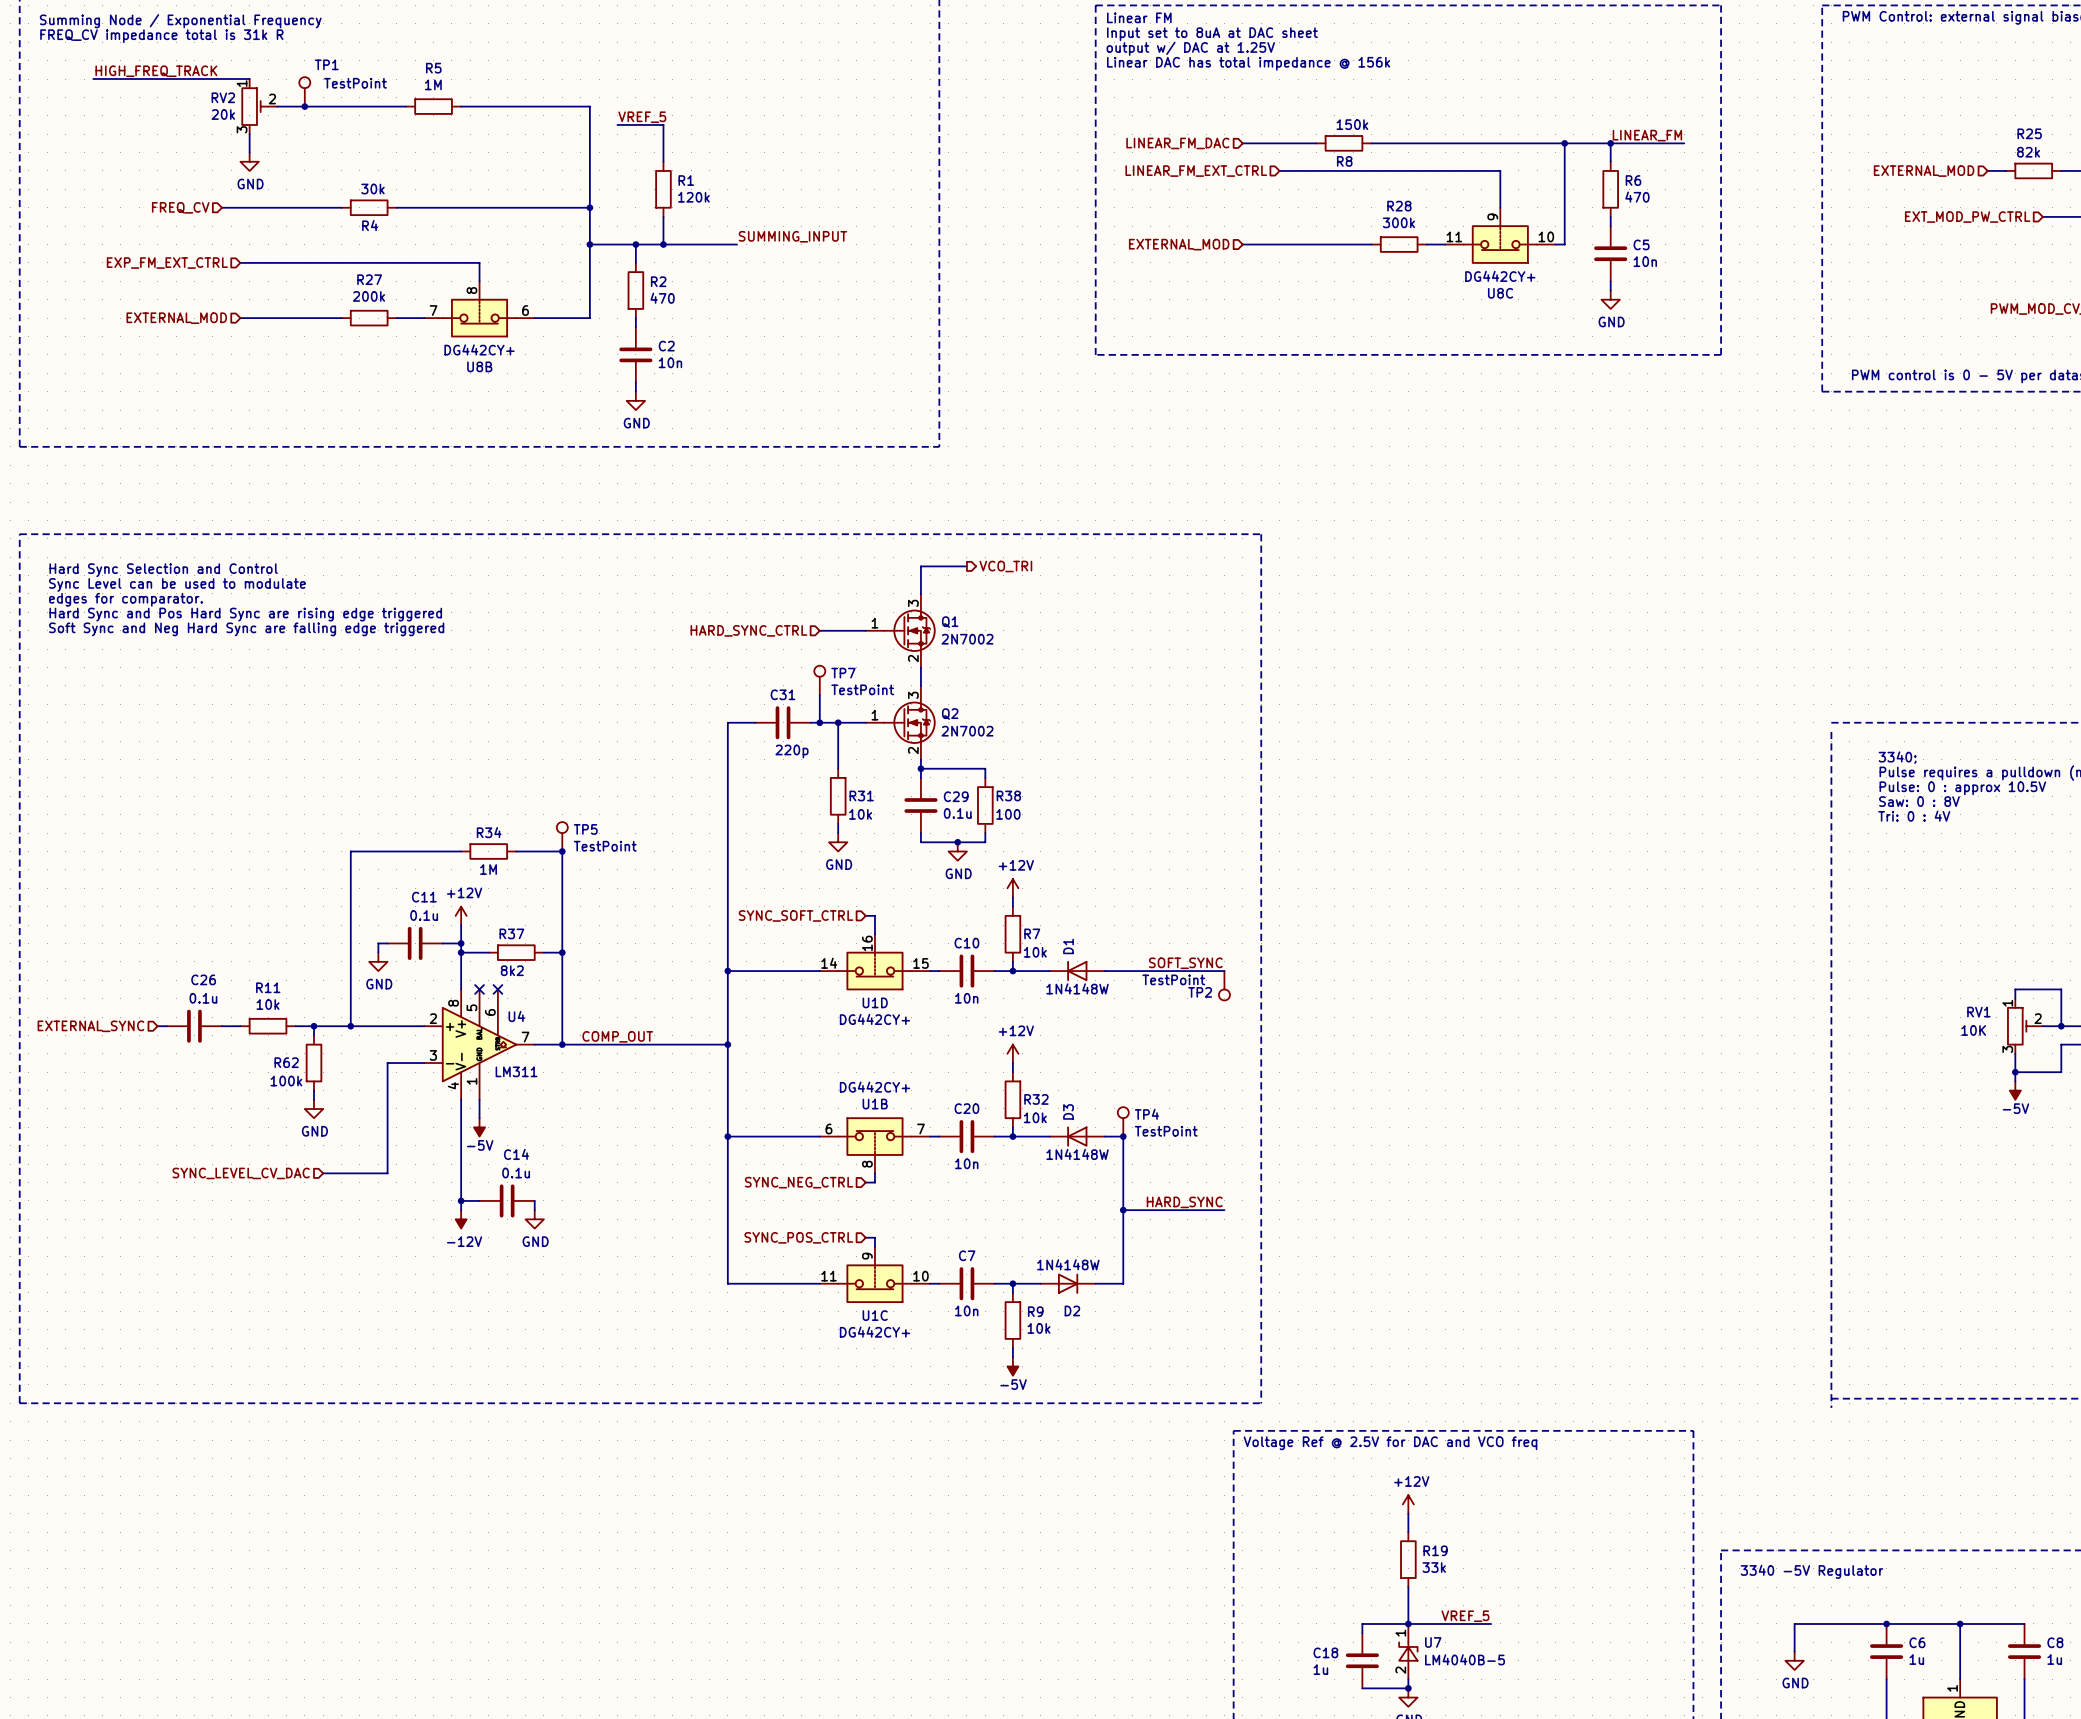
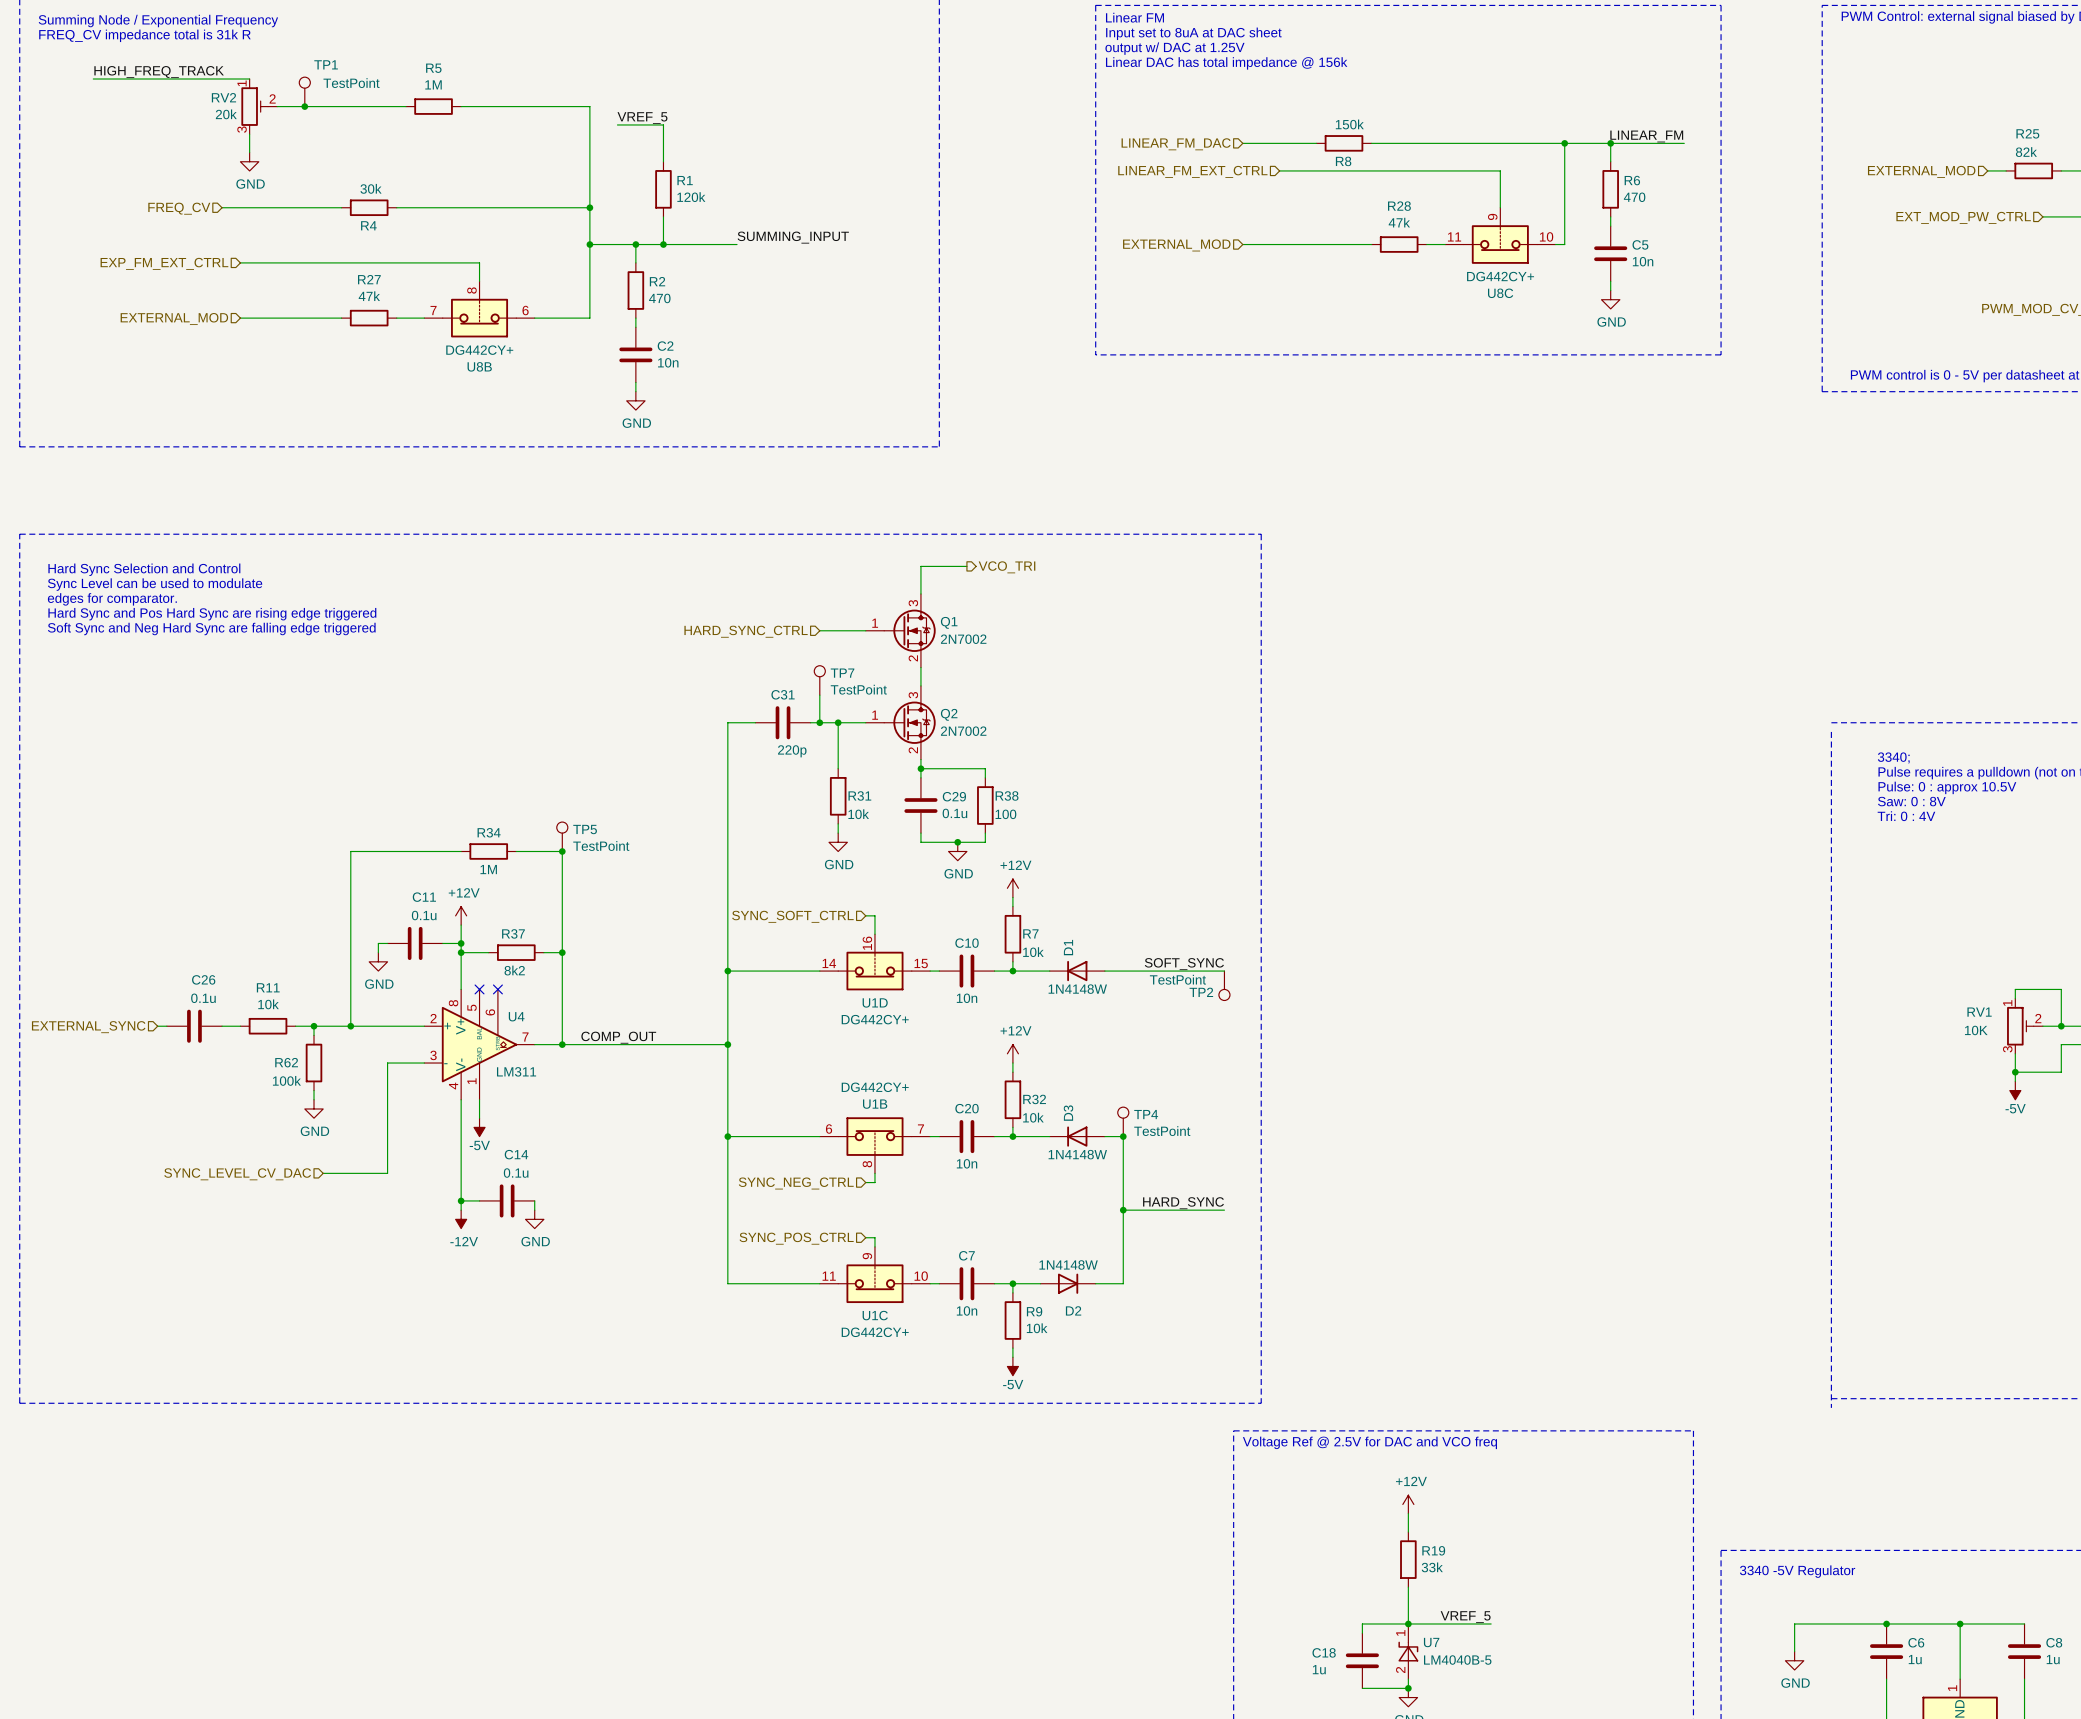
R28 value: 300k (1398, 222) -> 47k (1399, 222)
R27 value: 200k (368, 296) -> 47k (369, 296)

